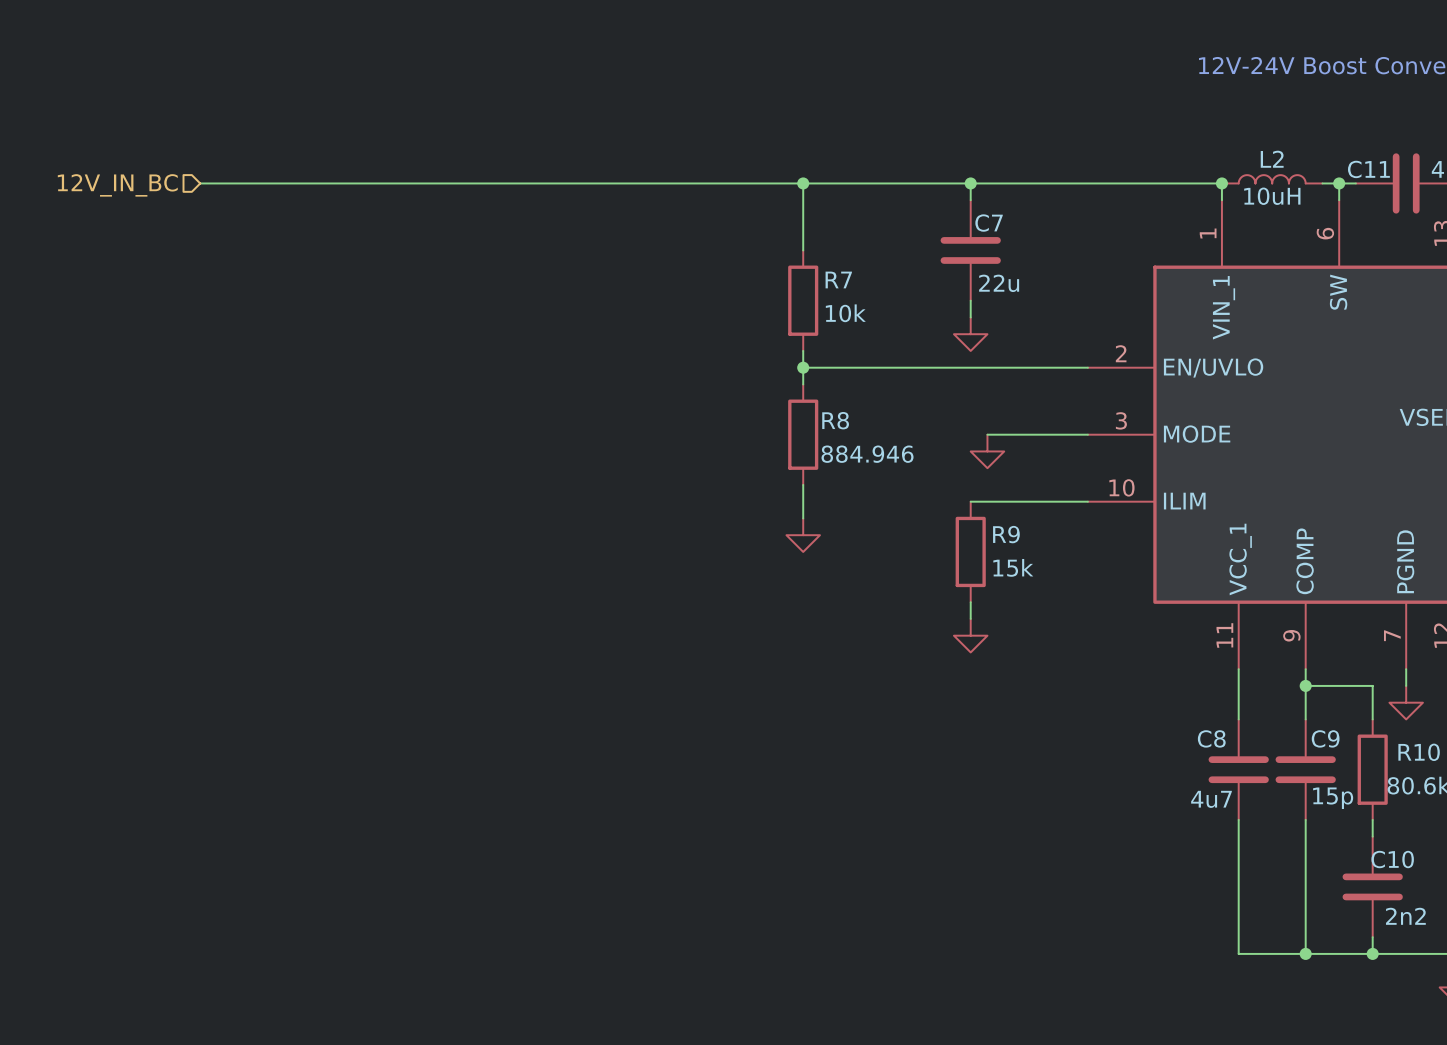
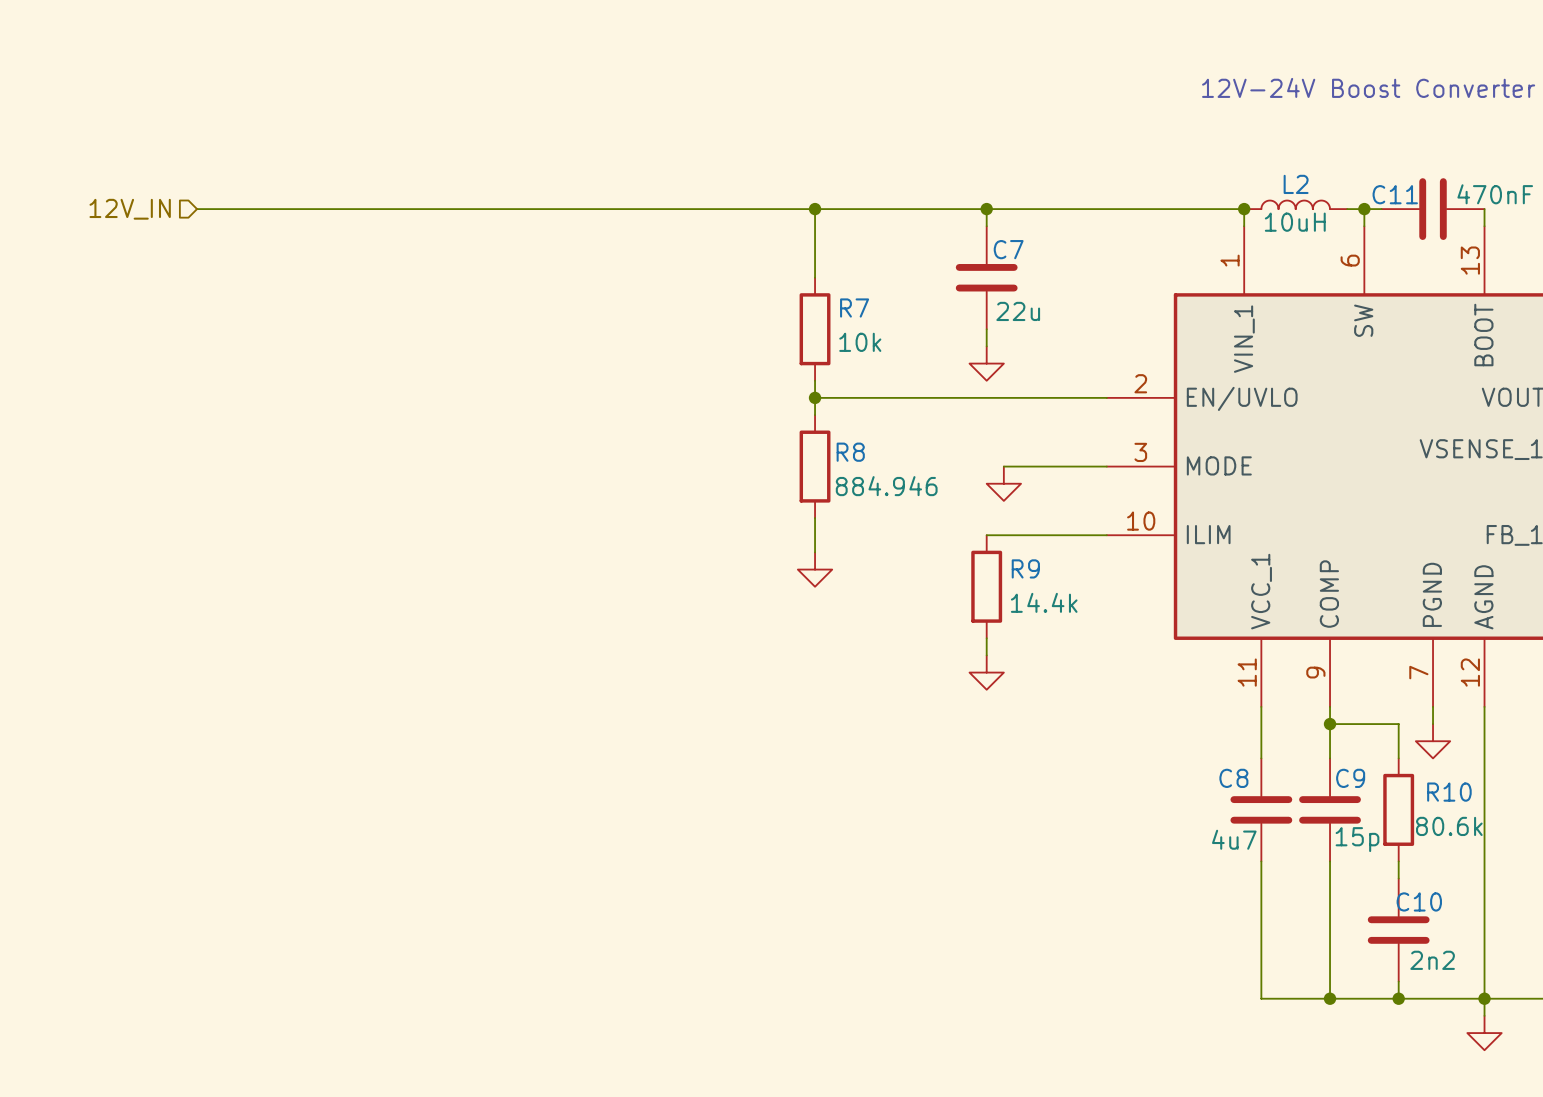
hierarchical label: 12V_IN_BC (117, 185) -> 12V_IN (130, 209)
R9 value: 15k (1013, 567) -> 14.4k (1044, 602)

